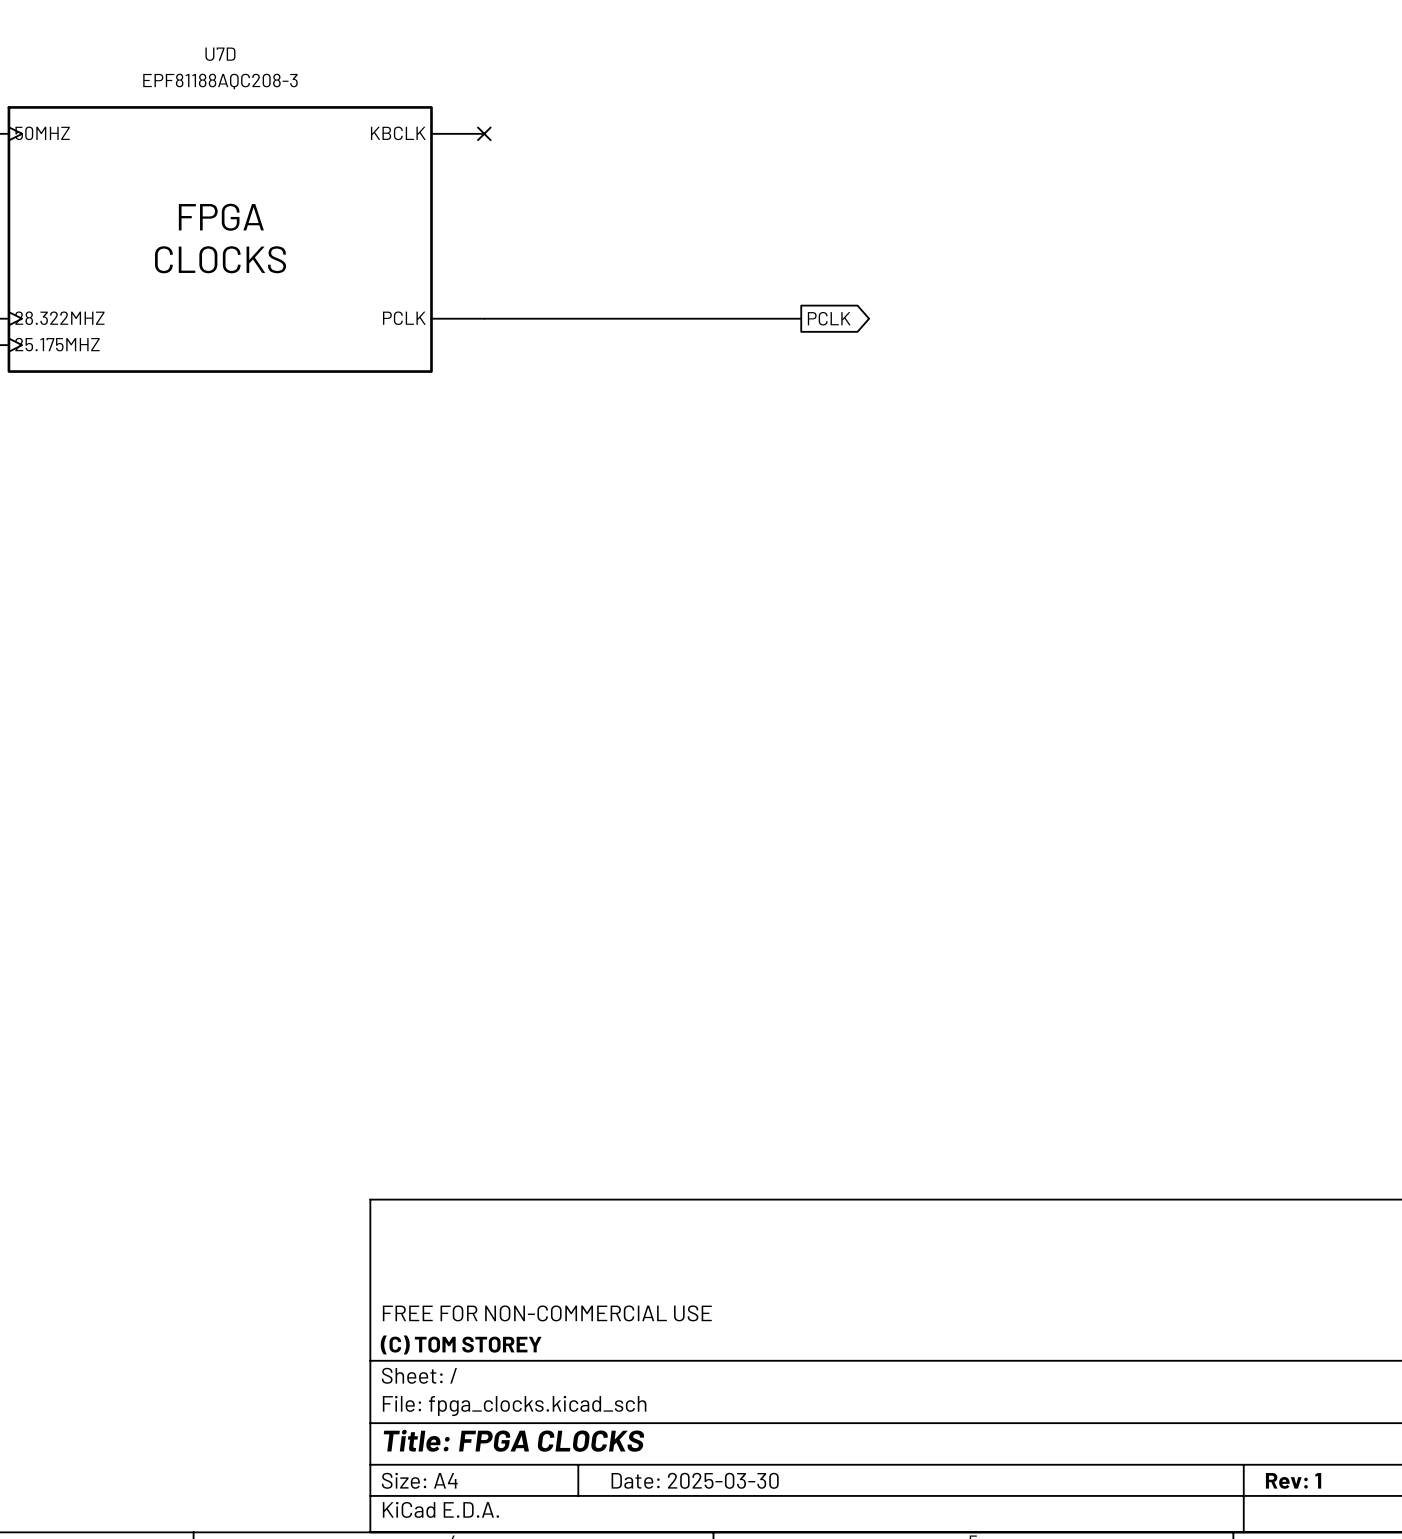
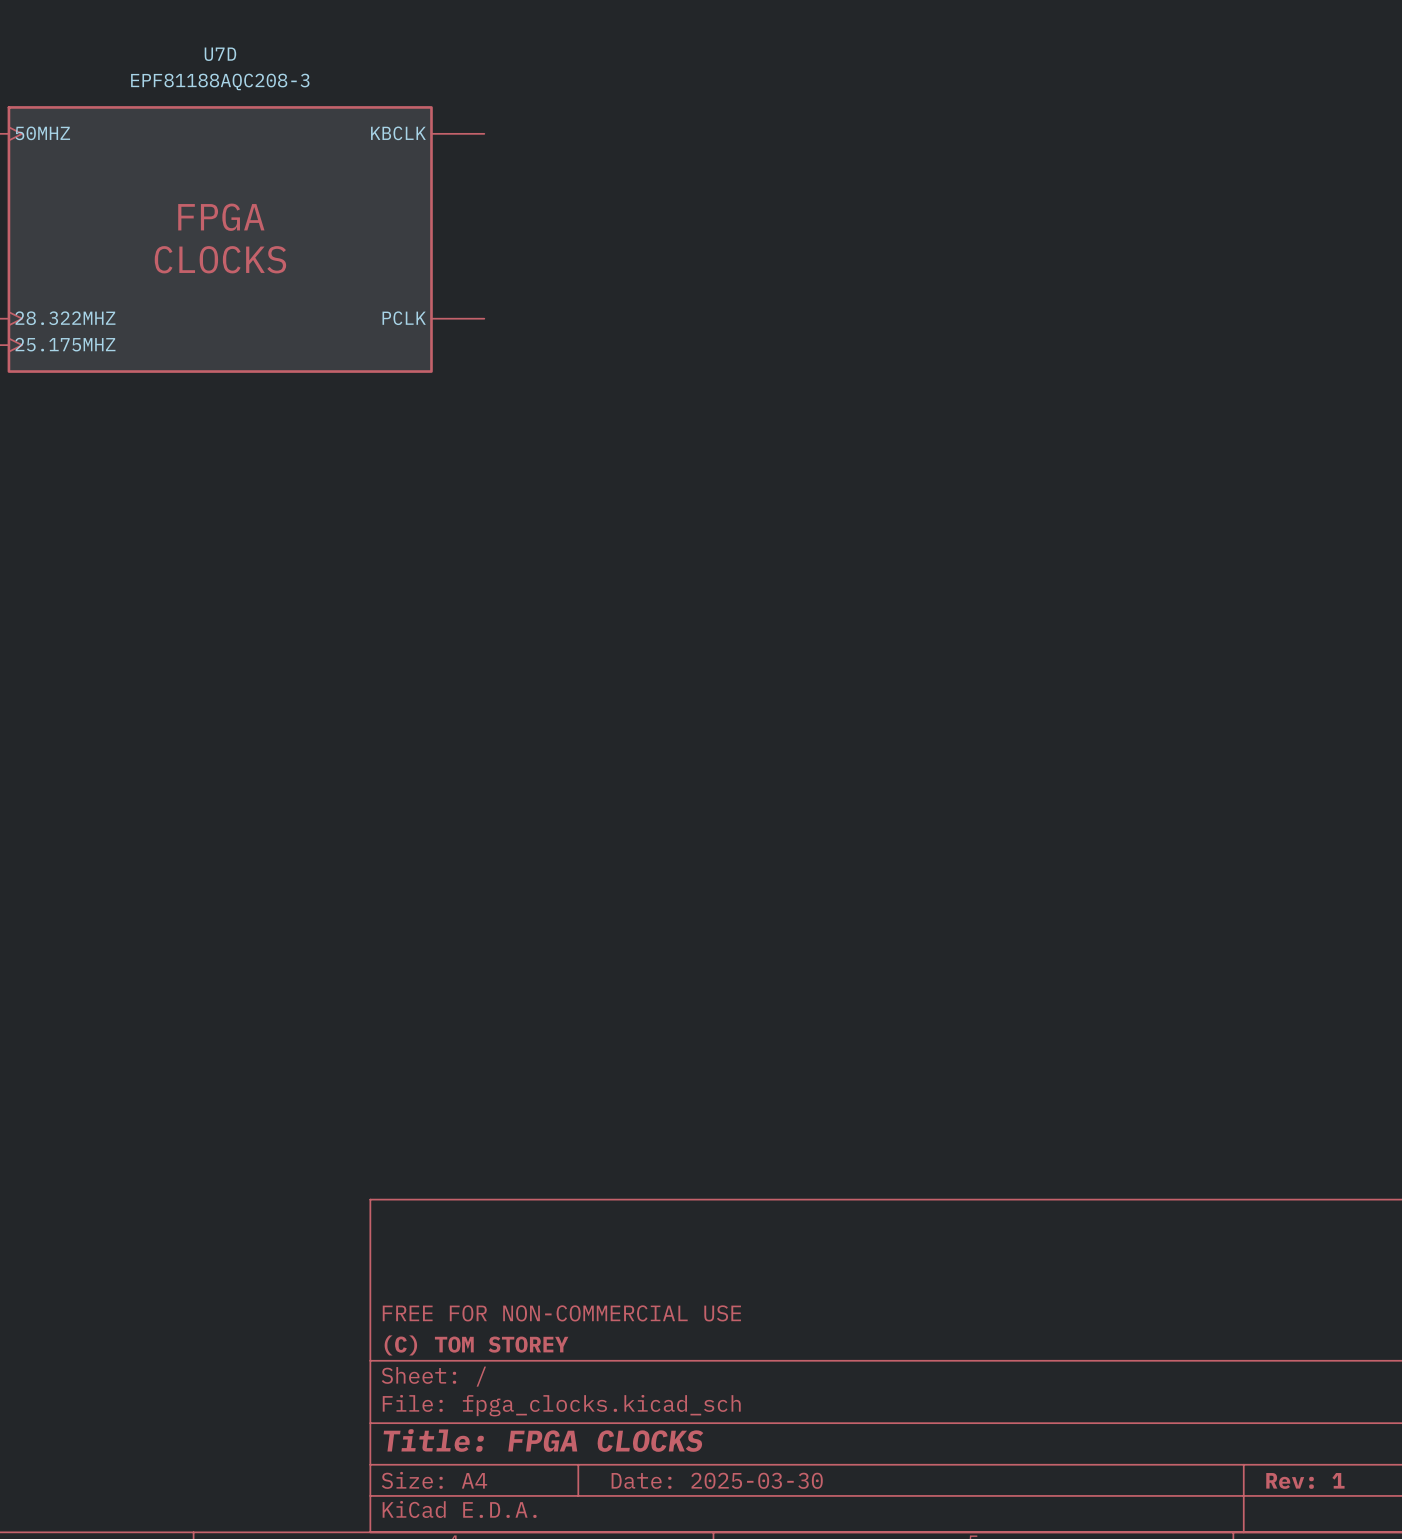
no-connect mark: (484, 133) -> none
wire: (484, 318) (801, 318) -> none
global label: PCLK (829, 318) -> none

